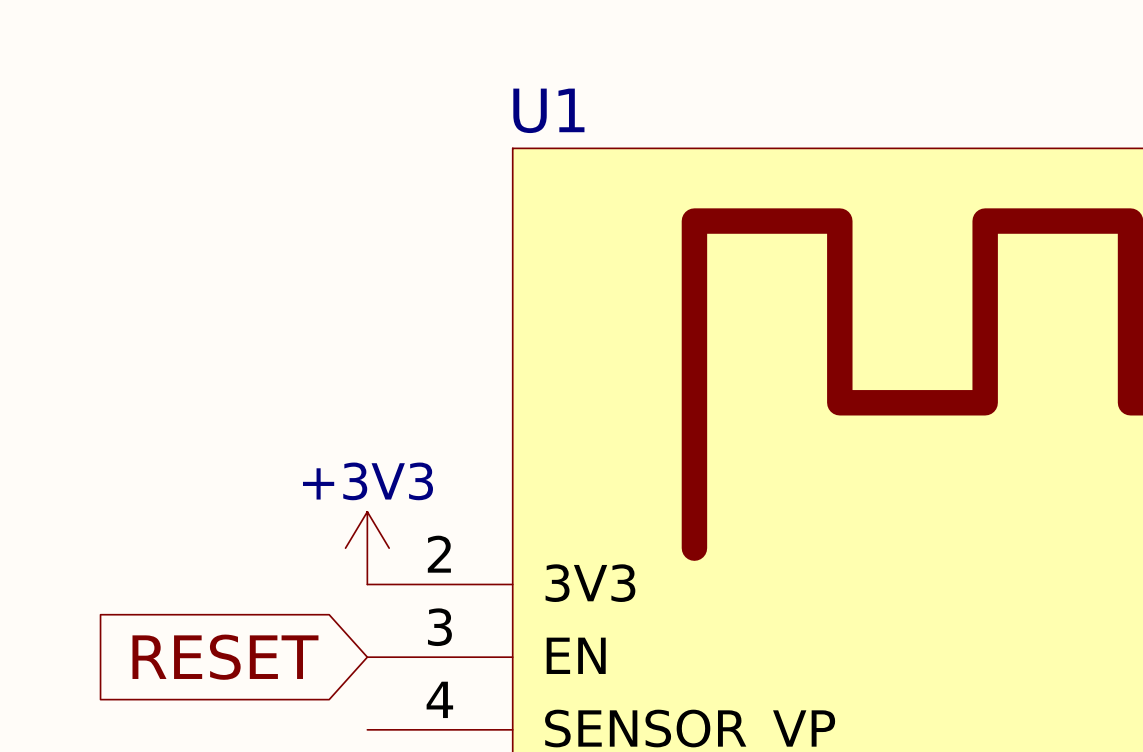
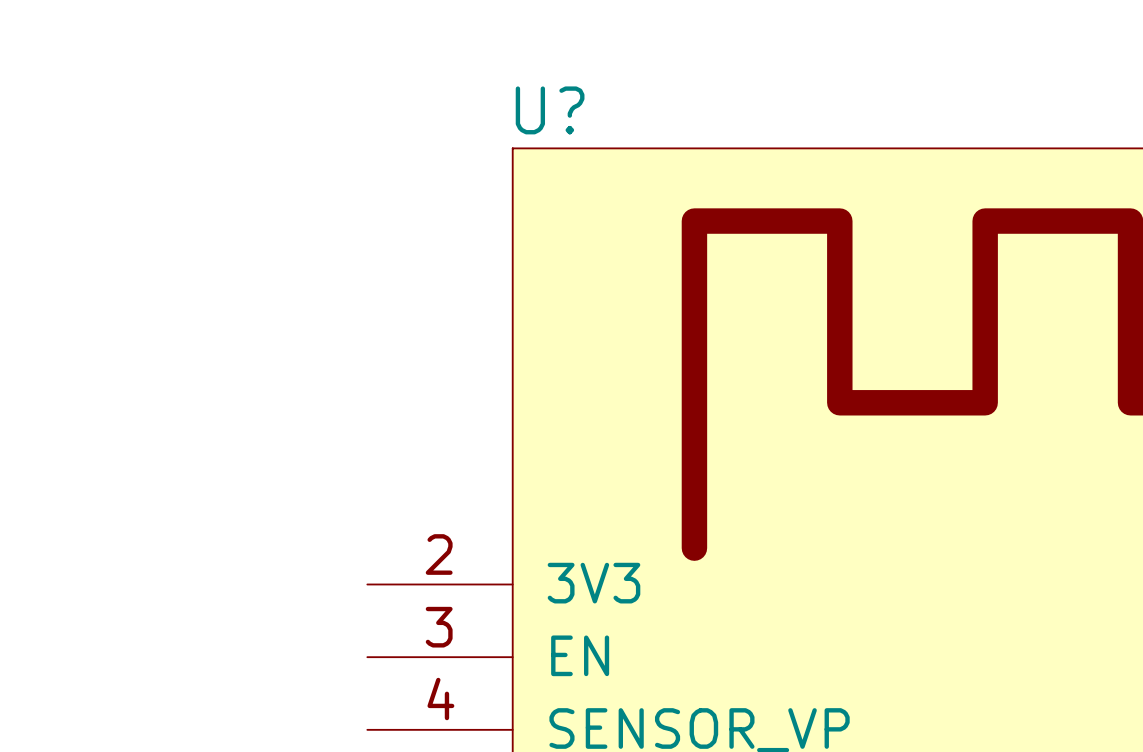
U1 name: U1 (548, 110) -> U? (550, 110)
power symbol: +3V3 (367, 548) -> none
global label: RESET (225, 657) -> none

